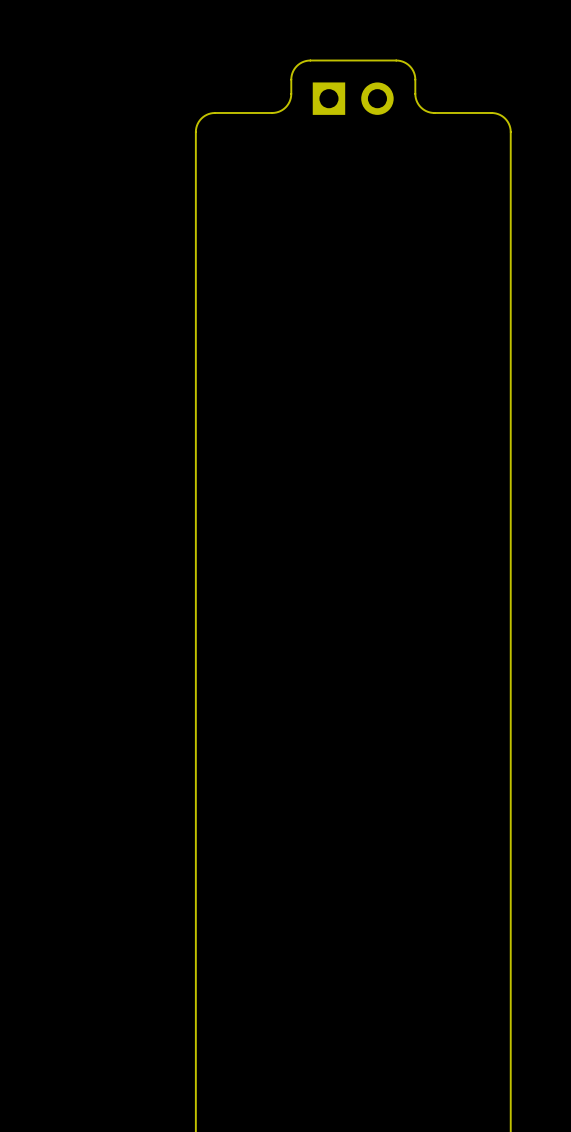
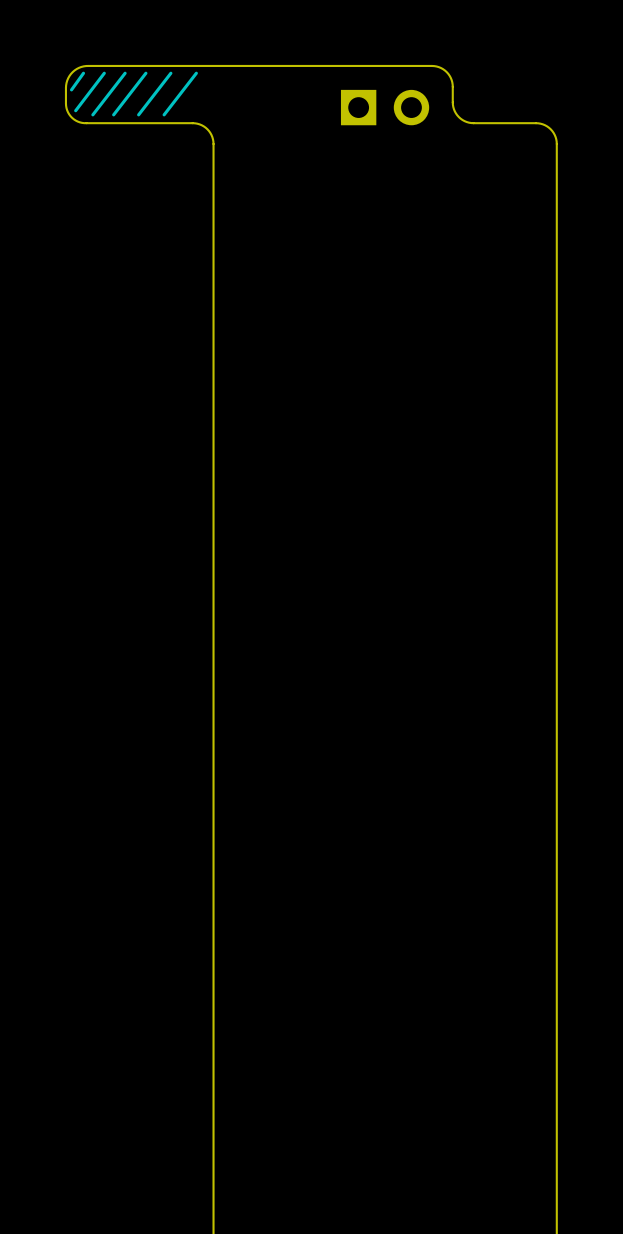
board edge: (310, 60) (302, 62) (294, 69) (291, 77) (290, 100) (282, 110) (272, 112) (210, 113) (200, 120) (195, 132) -> (338, 65) (86, 66) (74, 70) (68, 78) (66, 85) (66, 108) (70, 116) (77, 121) (84, 123) (195, 123) (207, 129) (211, 134) (213, 143)
line: none -> (83, 73) (71, 89)
line: none -> (104, 73) (75, 110)
line: none -> (125, 73) (92, 114)
line: none -> (145, 73) (113, 114)
line: none -> (170, 73) (138, 114)
line: none -> (196, 73) (164, 114)

